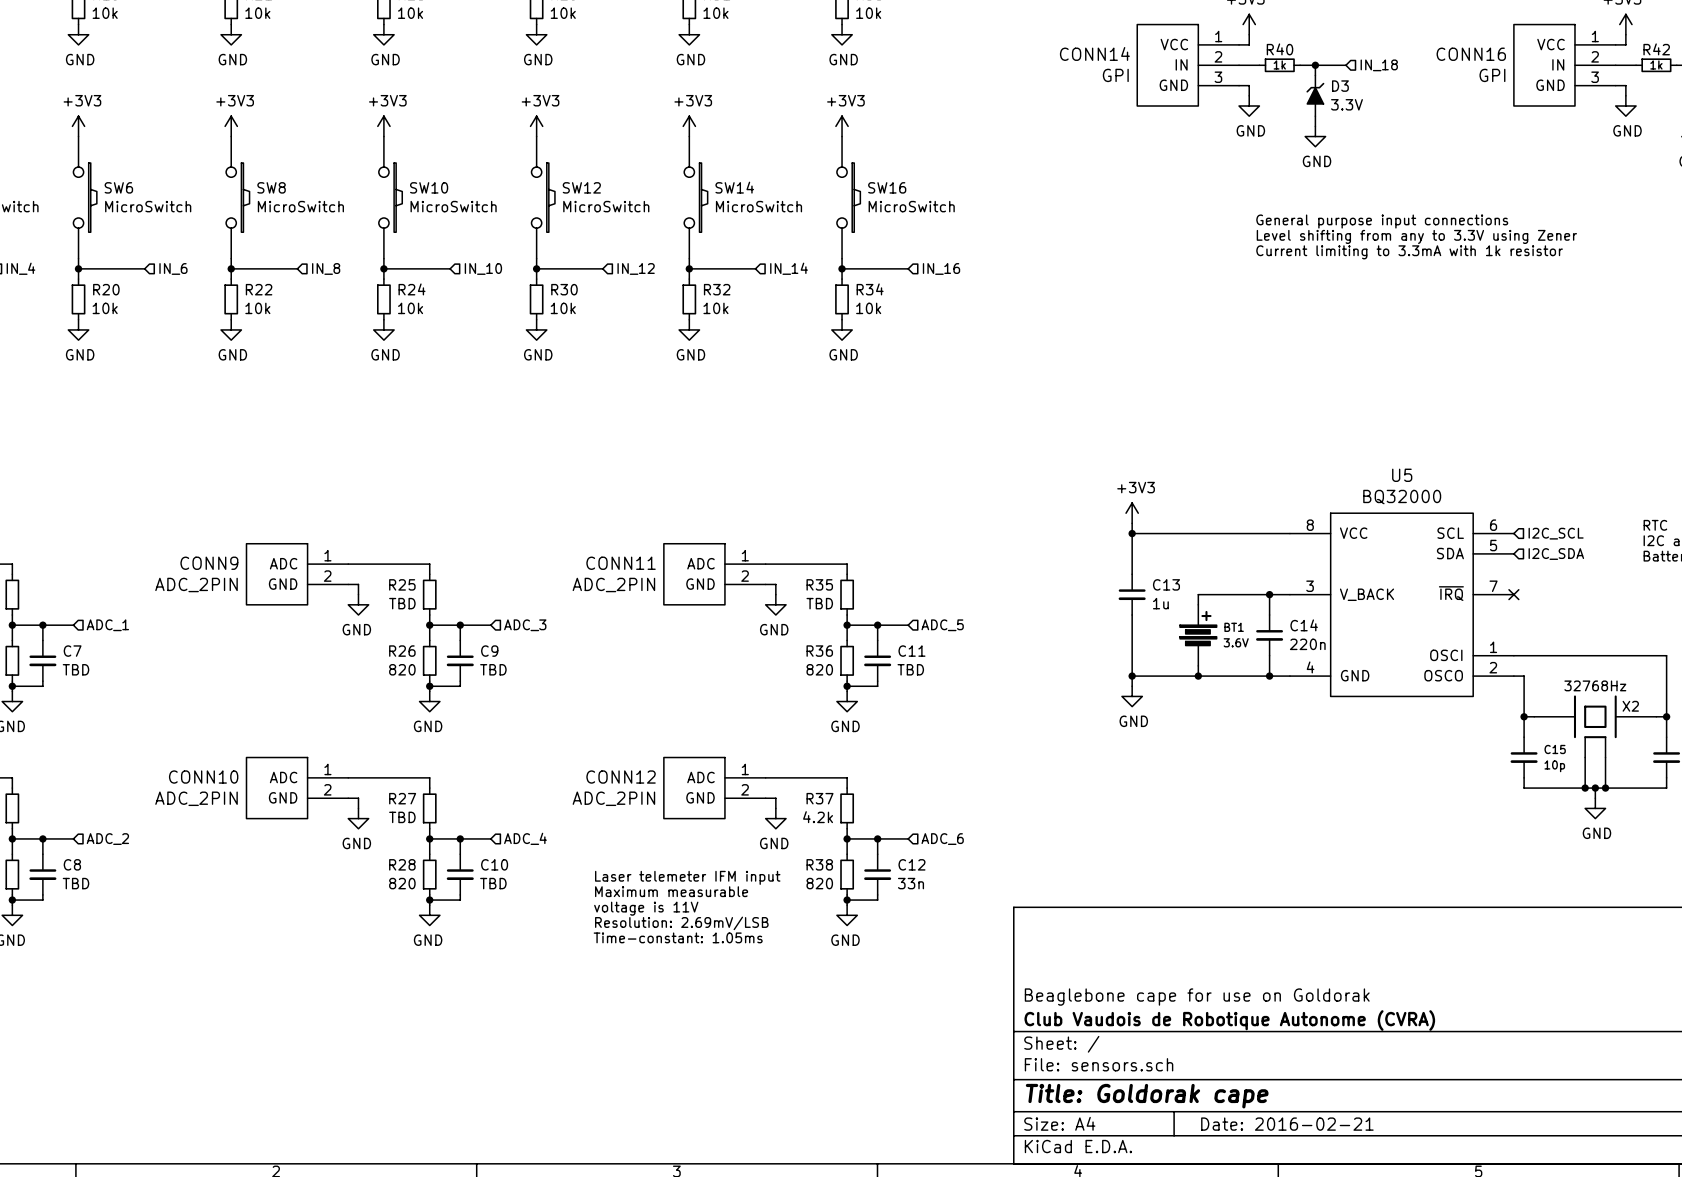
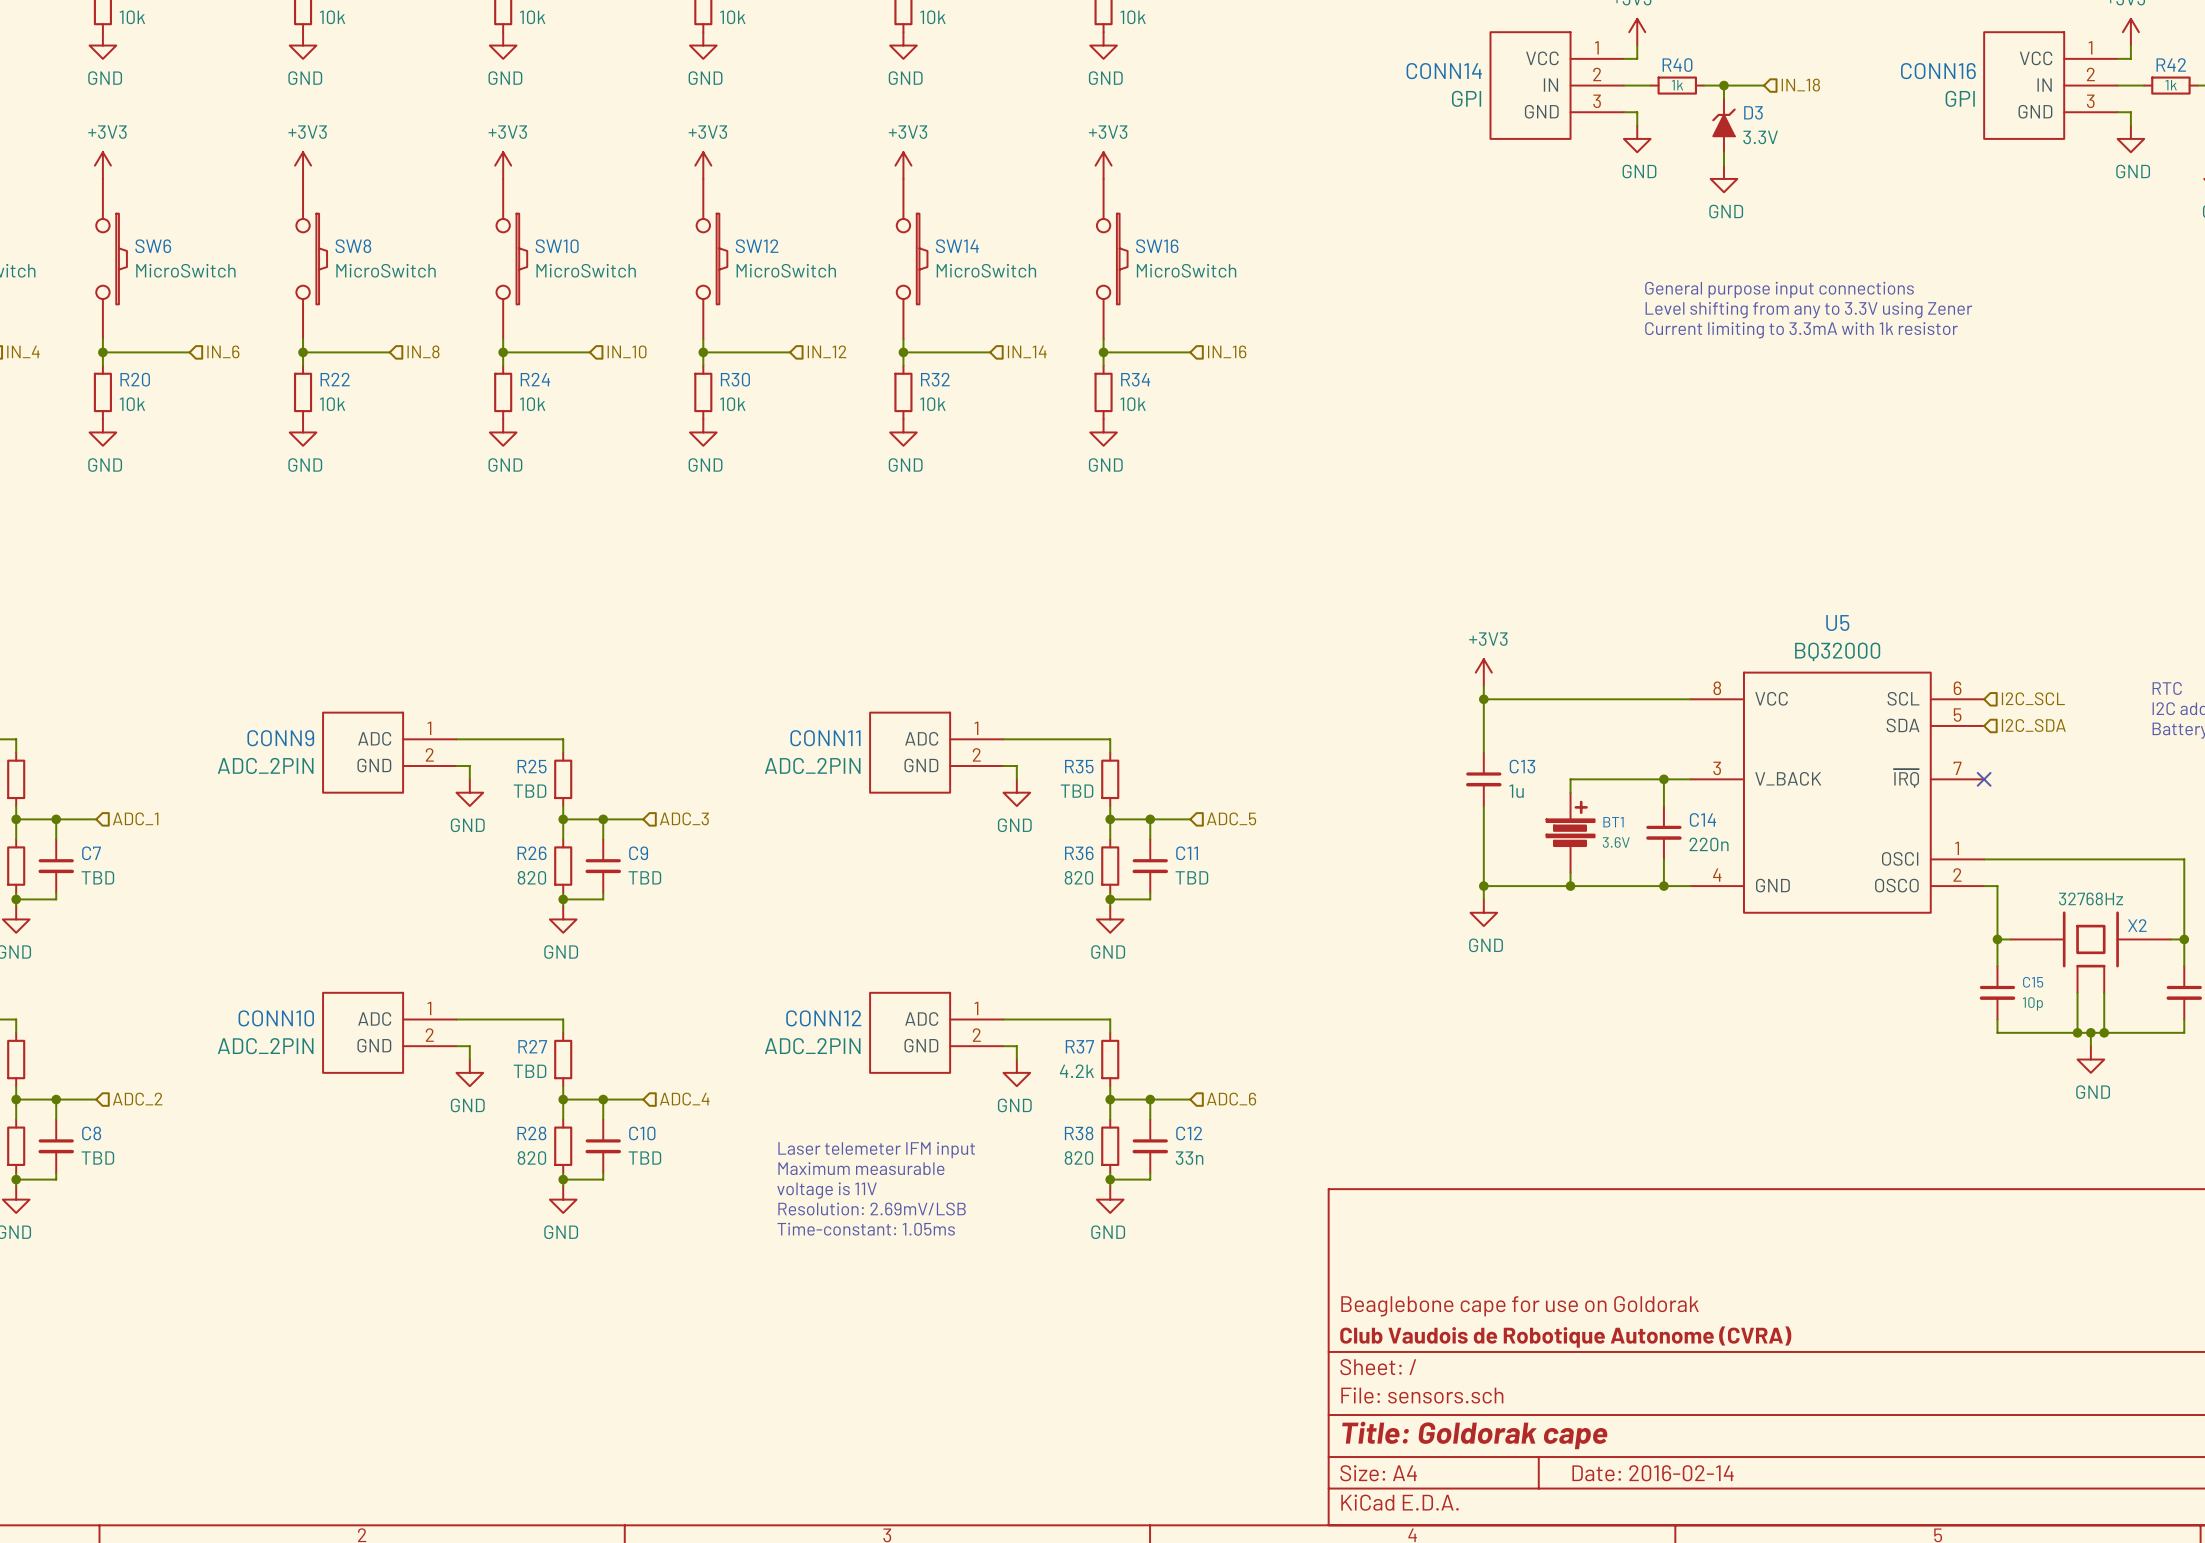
title block: Date: 2016-02-21 (1287, 1124) -> Date: 2016-02-14 (1653, 1473)

